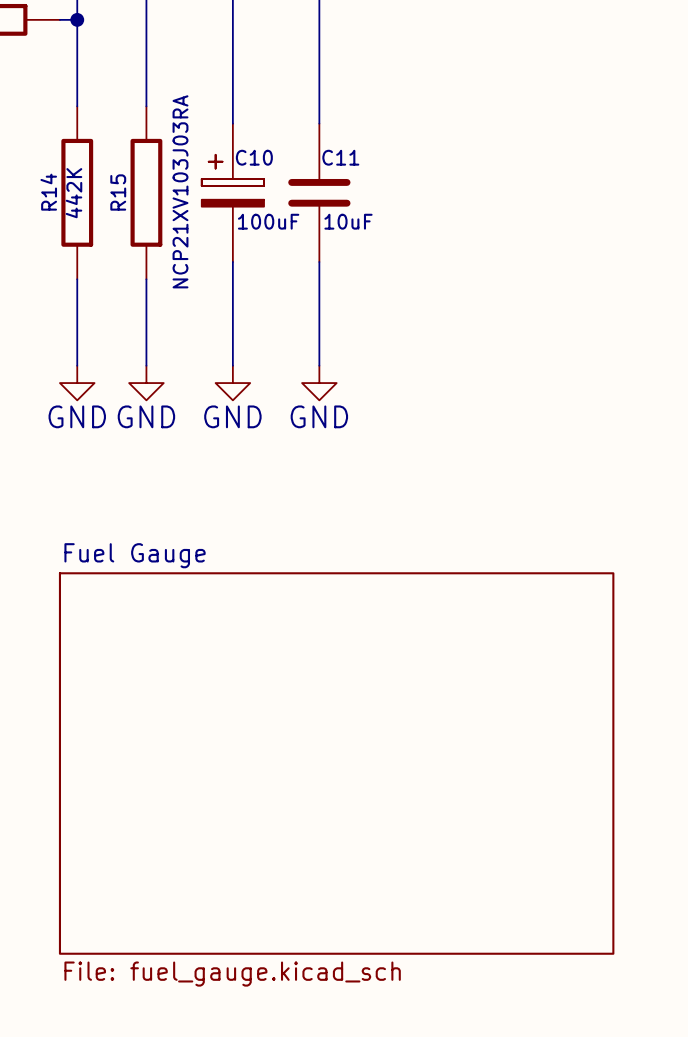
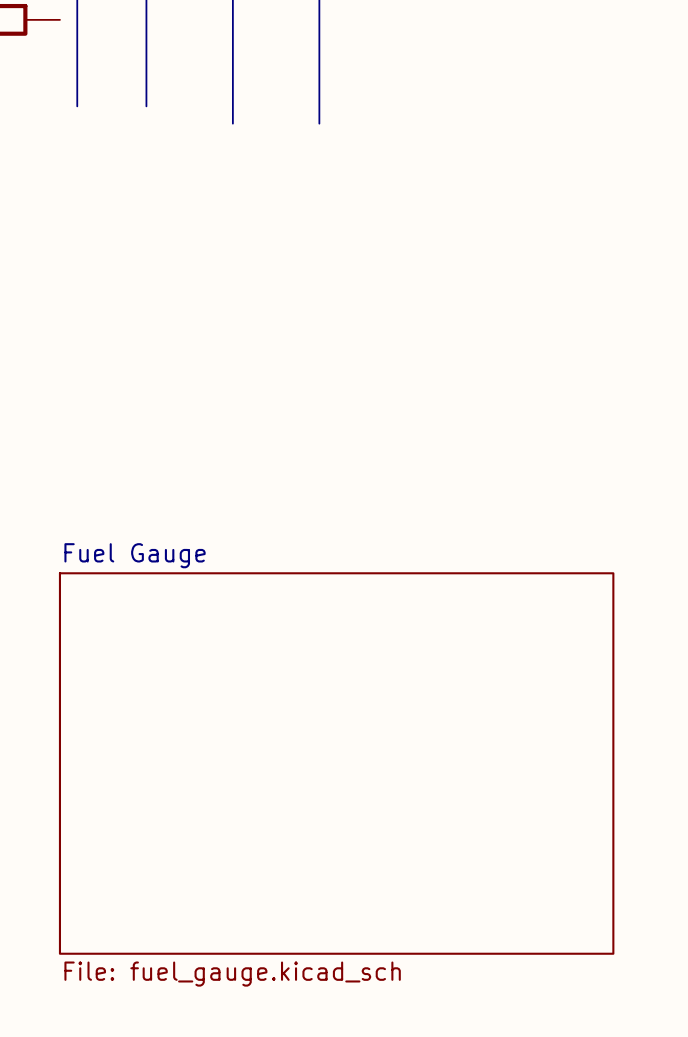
wire: (59, 19) (77, 19) -> none
junction: (77, 19) -> none
R14: 442K (77, 192) -> none
R15: NCP21XV103J03RA (146, 192) -> none
C10: 100uF (232, 192) -> none
C11: 10uF (319, 192) -> none
wire: (232, 261) (232, 365) -> none
wire: (319, 261) (319, 365) -> none
wire: (77, 279) (77, 365) -> none
wire: (146, 279) (146, 365) -> none
power symbol: GND (77, 383) -> none
power symbol: GND (146, 383) -> none
power symbol: GND (232, 383) -> none
power symbol: GND (319, 383) -> none

